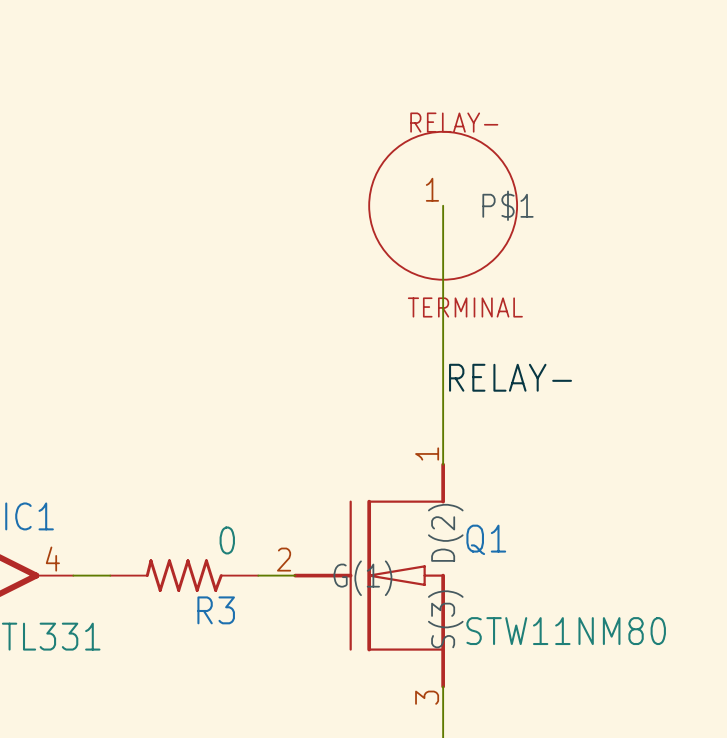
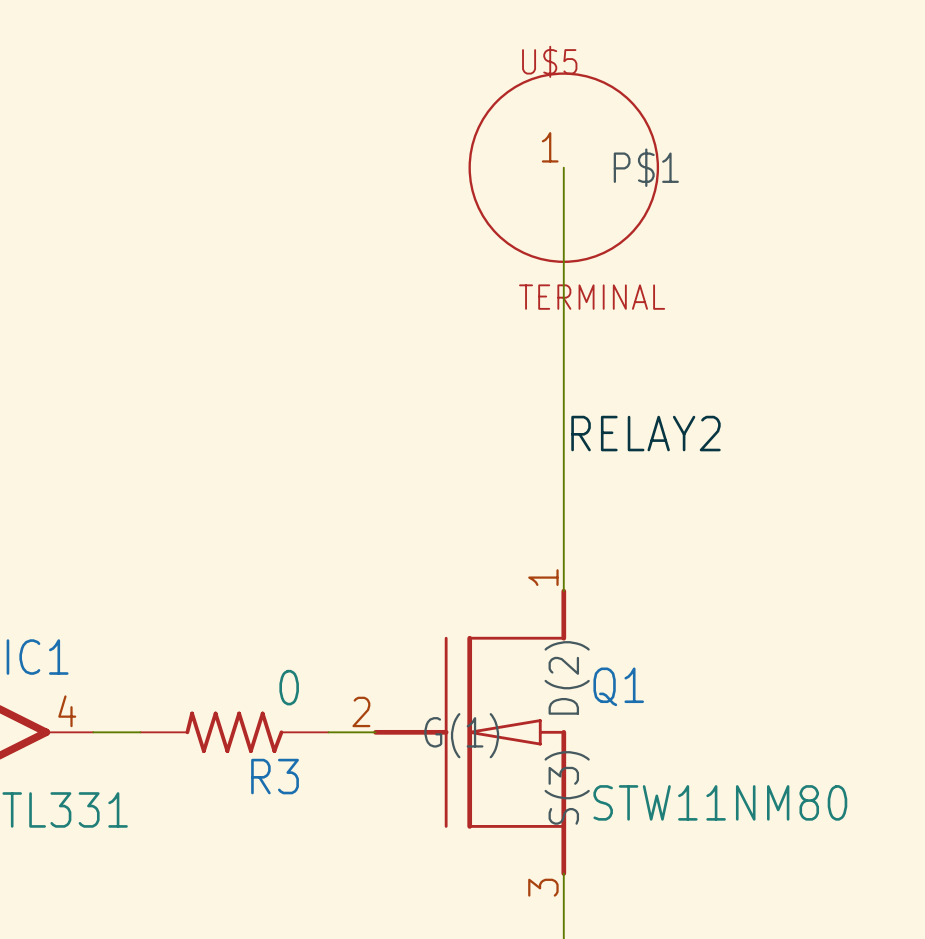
wire: none -> (563, 167) (563, 261)
U$5: none -> TERMINAL (563, 167)
RELAY-: TERMINAL (443, 205) -> none
label: RELAY- (510, 377) -> RELAY2 (645, 433)

